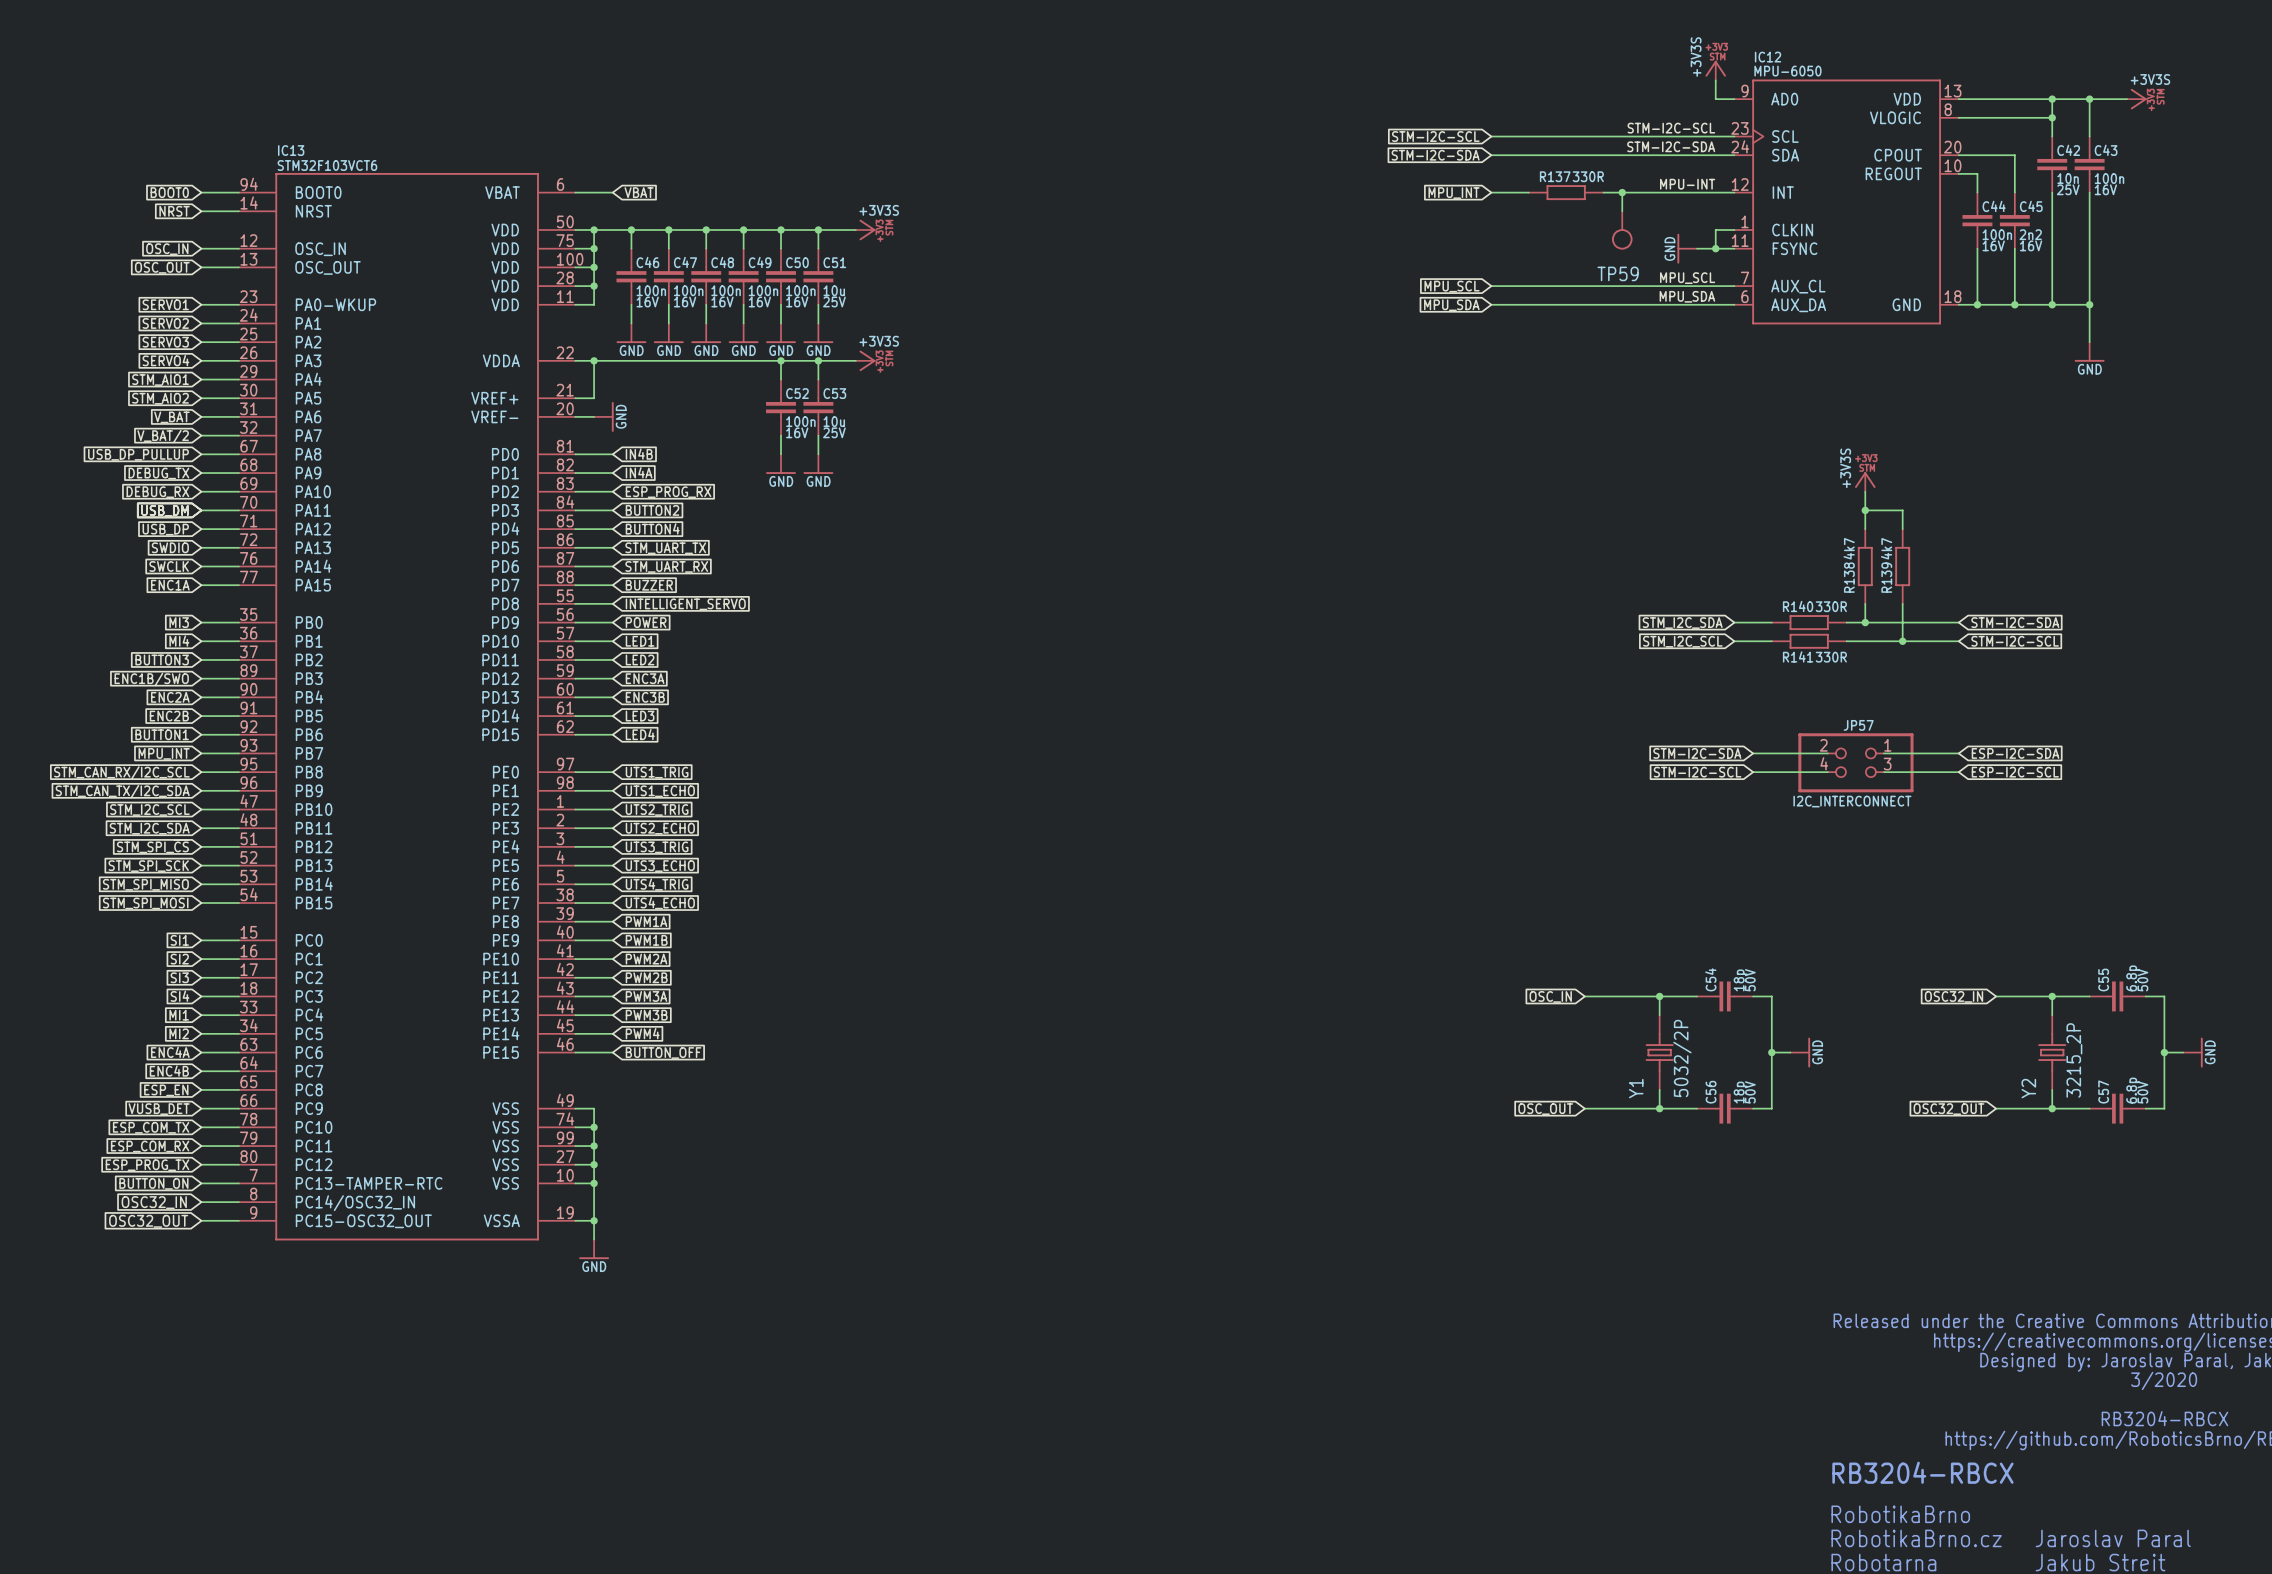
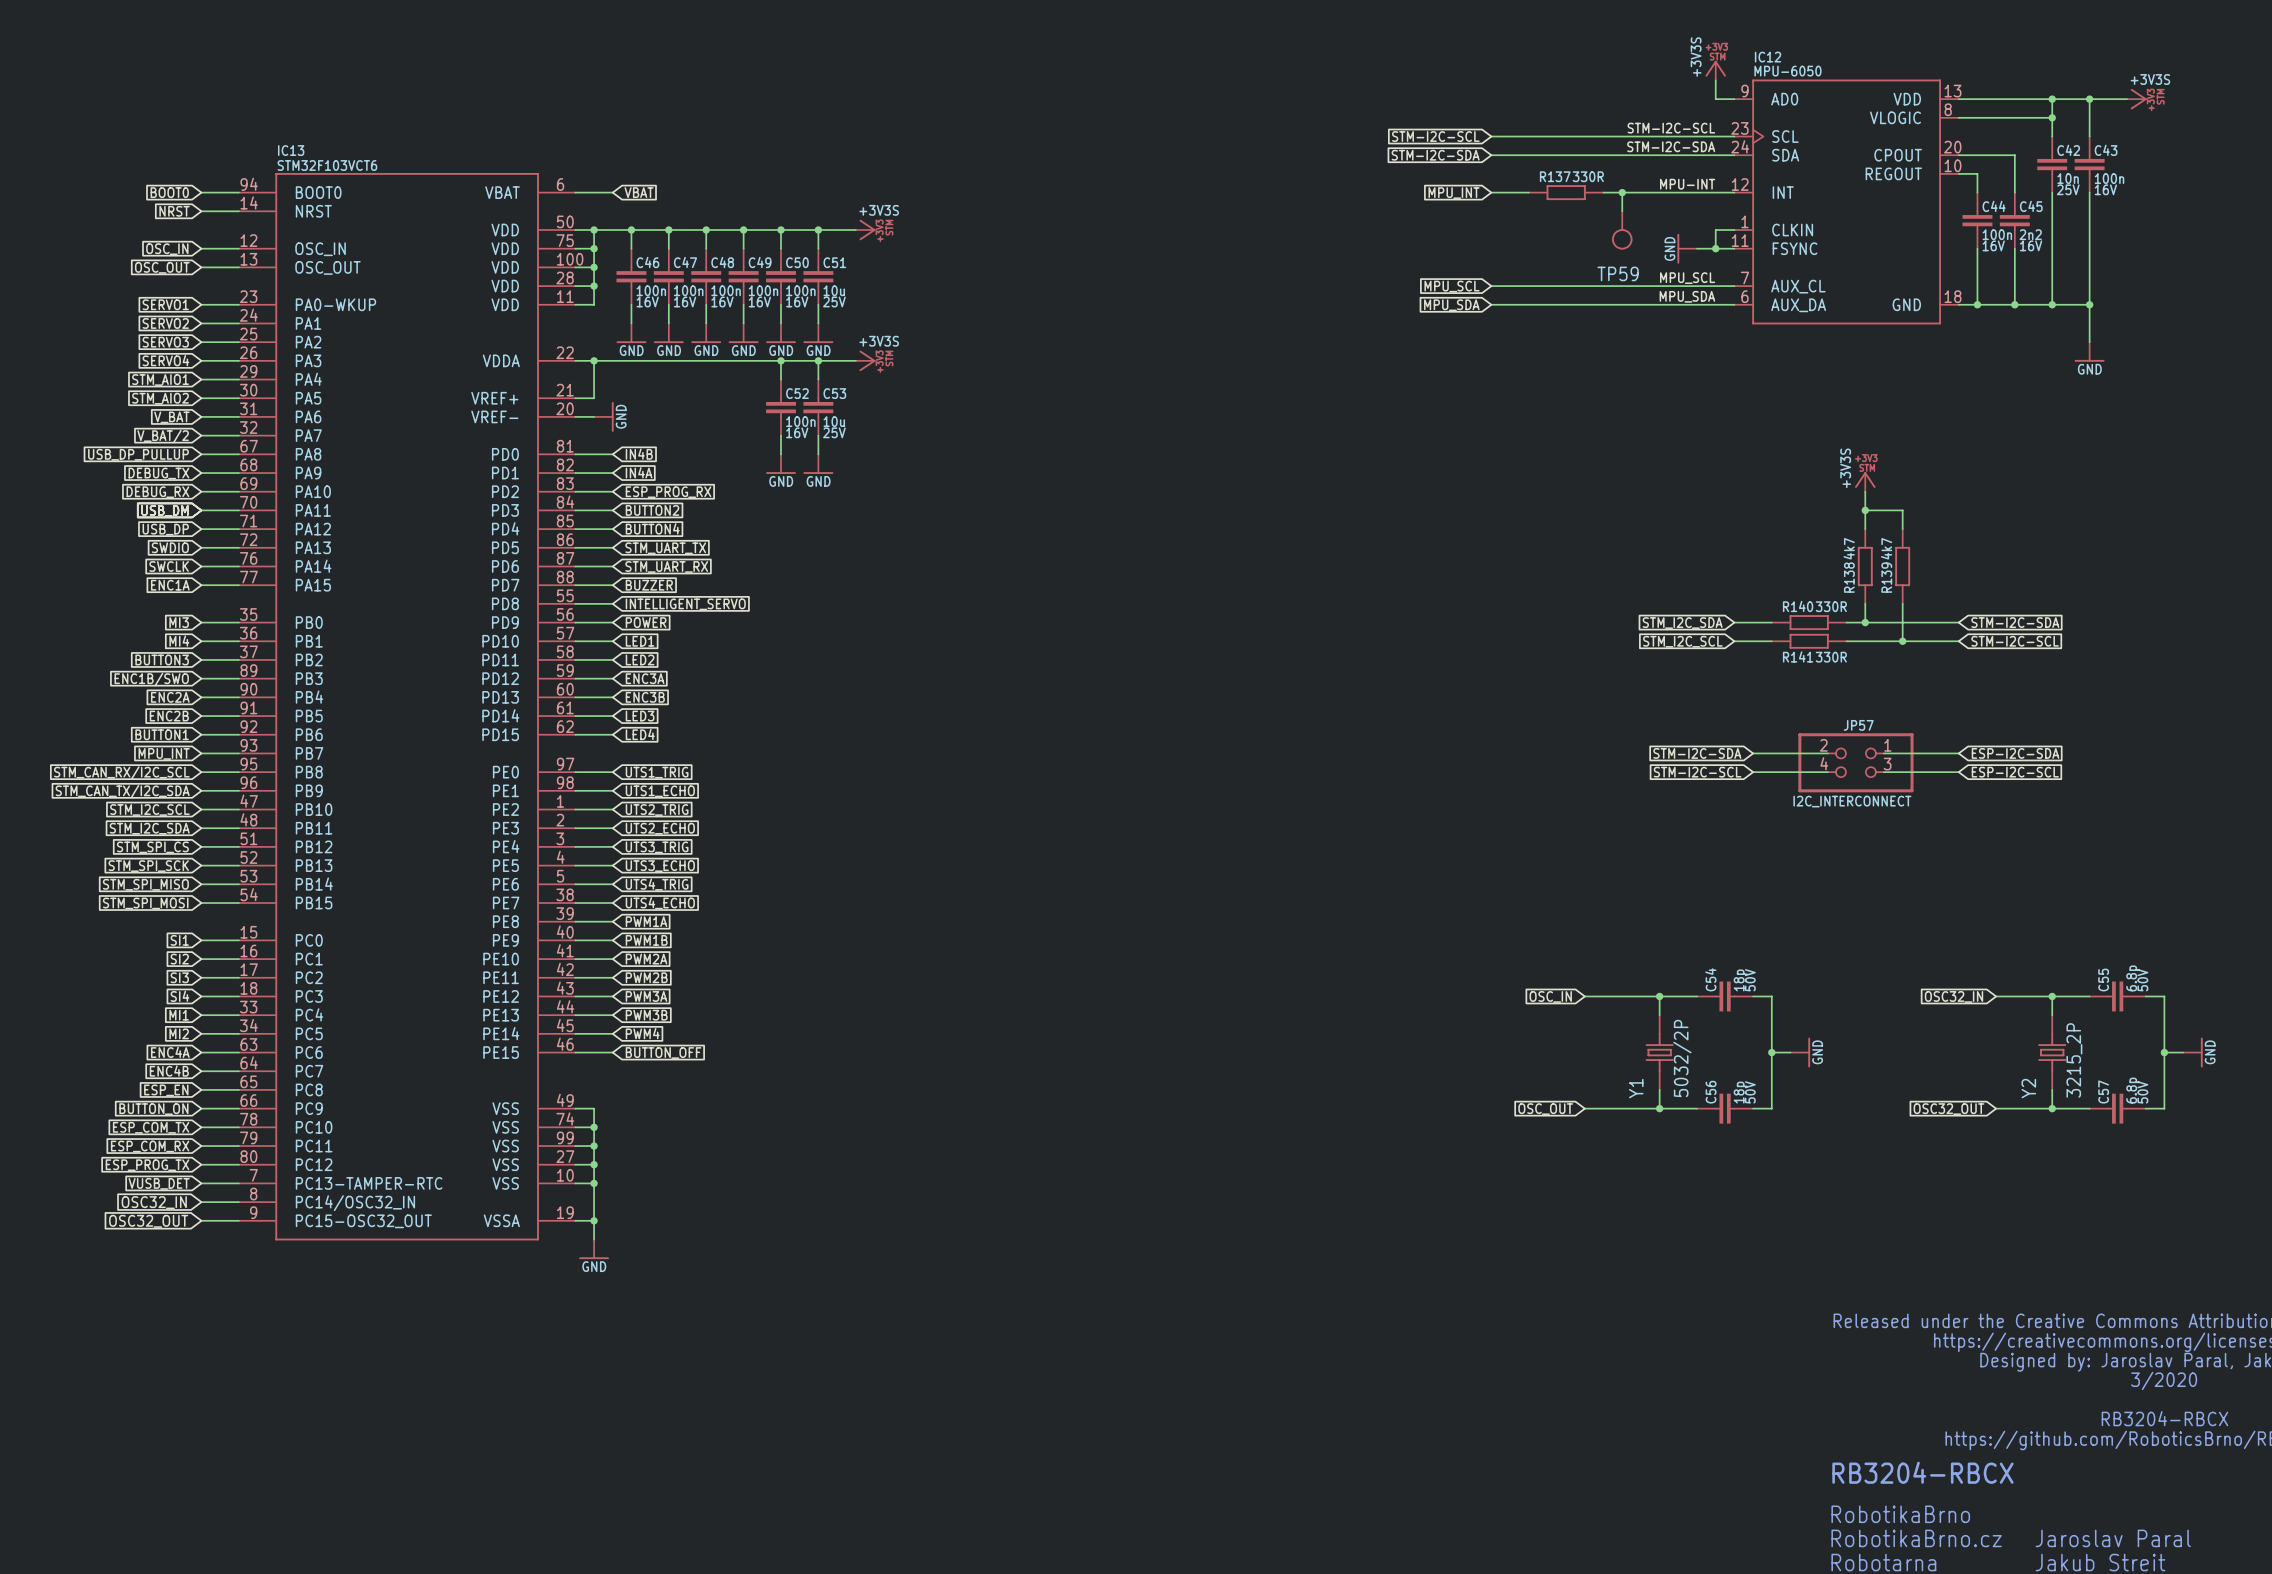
global label: VUSB_DET (159, 1109) -> BUTTON_ON (153, 1109)
global label: BUTTON_ON (153, 1183) -> VUSB_DET (159, 1183)

